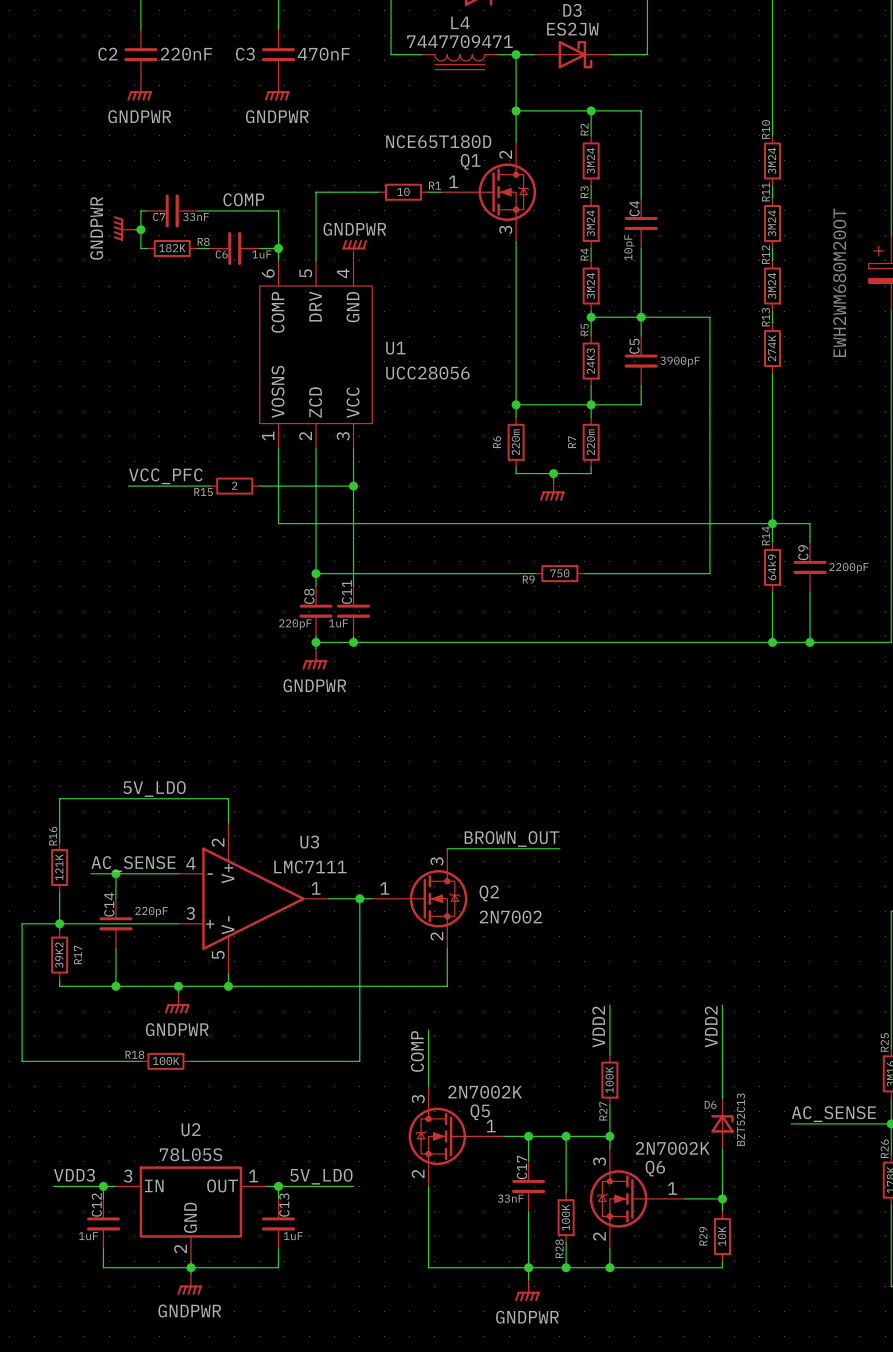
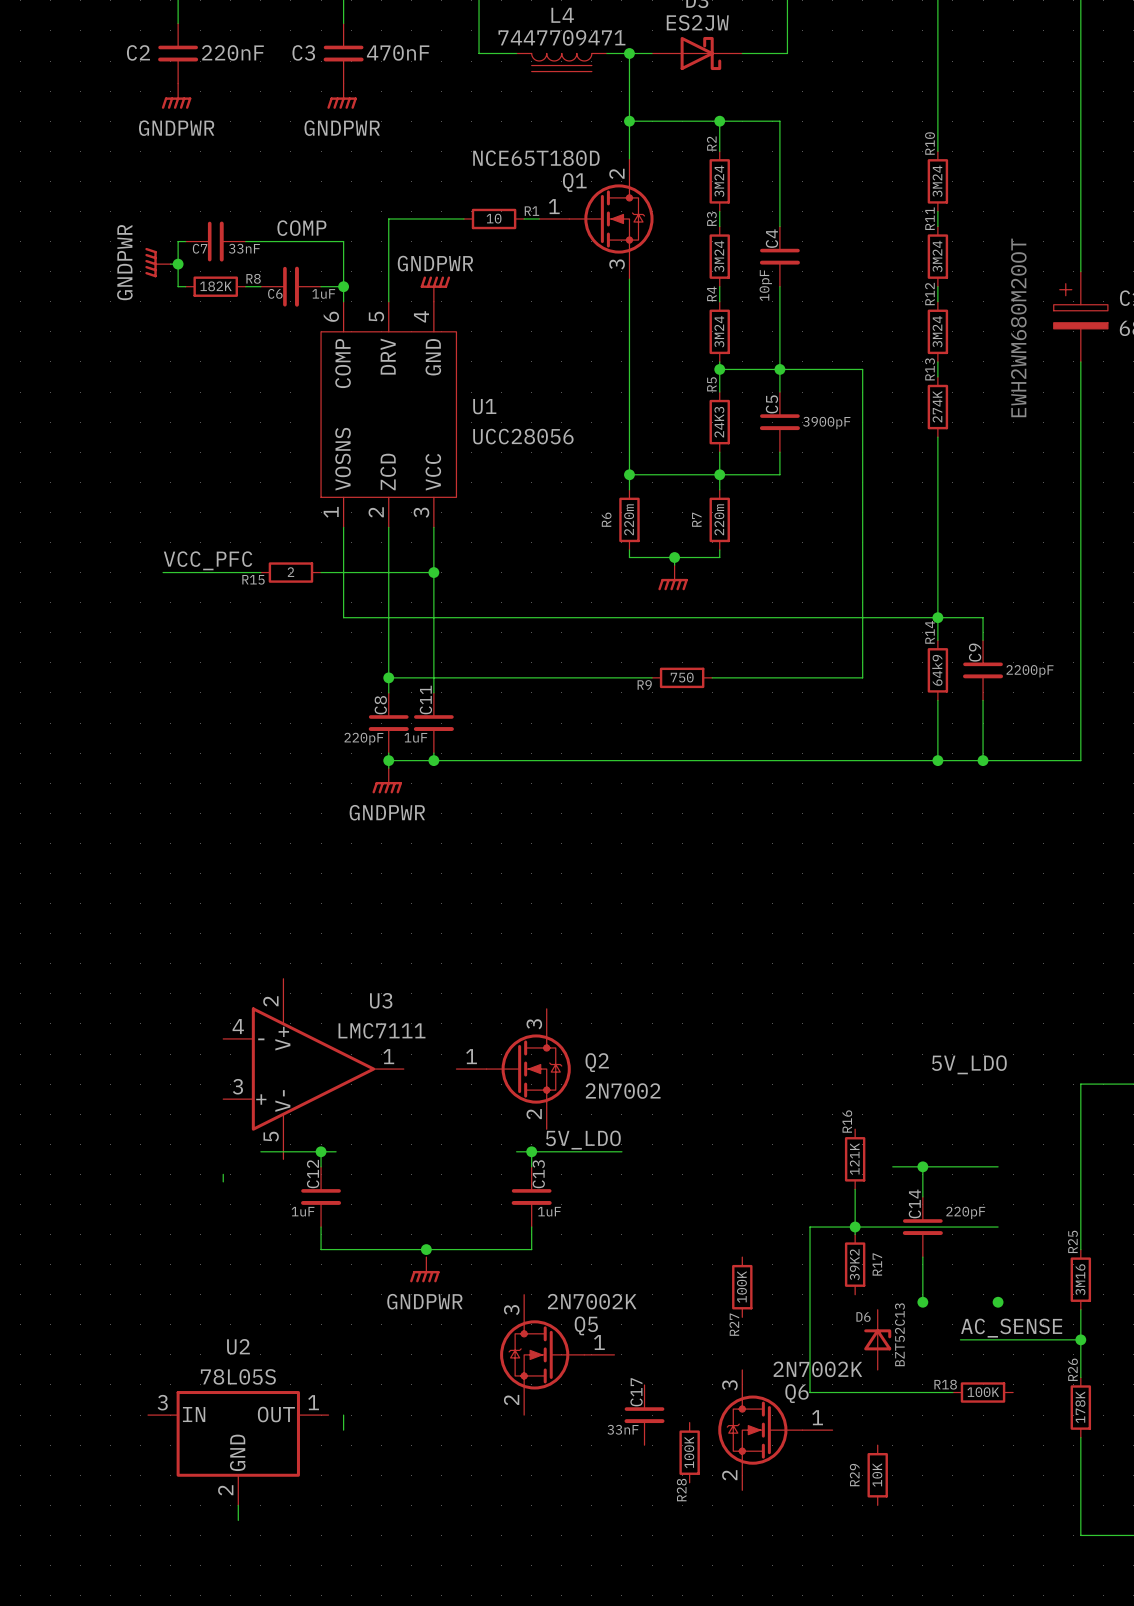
label: 5V_LDO (154, 788) -> none
wire: (228, 823) (228, 798) (59, 798) (59, 842) -> none
label: BROWN_OUT (512, 839) -> none
wire: (447, 848) (559, 848) -> none
label: AC_SENSE (133, 864) -> none
R16 position: (59, 867) -> (855, 1159)
wire: (90, 873) (178, 873) -> none
wire: (115, 873) (115, 898) -> none
junction: (115, 873) -> none
wire: (59, 892) (59, 930) -> none
label: none -> 5V_LDO (969, 1064)
wire: (328, 898) (372, 898) -> none
wire: (359, 898) (359, 1061) (190, 1061) -> none
junction: (359, 898) -> none
junction: (59, 923) -> none
C14 position: (115, 923) -> (922, 1227)
wire: (178, 923) (22, 923) (22, 1061) (140, 1061) -> none
wire: (115, 948) (115, 986) -> none
wire: (447, 948) (447, 986) (59, 986) (59, 980) -> none
R17 position: (59, 955) -> (855, 1264)
label: none -> 5V_LDO (583, 1140)
wire: none -> (260, 1151) (336, 1151)
wire: none -> (516, 1151) (621, 1151)
wire: none -> (531, 1151) (531, 1166)
junction: none -> (531, 1151)
wire: (228, 973) (228, 986) -> (321, 1151) (321, 1166)
wire: none -> (892, 1166) (998, 1166)
wire: none -> (922, 1166) (922, 1196)
junction: none -> (922, 1166)
junction: (115, 986) -> none
junction: (178, 986) -> none
junction position: (228, 986) -> (321, 1151)
wire: none -> (855, 1189) (855, 1234)
power symbol: GNDPWR (177, 1003) -> none
wire: (609, 1005) (609, 1055) -> none
wire: (722, 1005) (722, 1098) -> none
label: VDD2 (598, 1026) -> none
label: VDD2 (711, 1026) -> none
wire: none -> (321, 1227) (321, 1249) (531, 1249) (531, 1227)
wire: (428, 1030) (428, 1086) -> none
junction: none -> (855, 1227)
wire: none -> (998, 1227) (810, 1227) (810, 1392) (952, 1392)
junction: none -> (426, 1249)
label: COMP (417, 1051) -> none
wire: none -> (922, 1257) (922, 1302)
R18 position: (165, 1061) -> (983, 1392)
power symbol: none -> GNDPWR (424, 1269)
junction: none -> (922, 1302)
junction: none -> (998, 1302)
wire: (609, 1105) (609, 1148) -> none
wire: (503, 1136) (609, 1136) -> none
wire: (528, 1136) (528, 1161) -> none
junction: (528, 1136) -> none
wire: (566, 1136) (566, 1192) -> none
junction: (566, 1136) -> none
junction: (609, 1136) -> none
wire: (722, 1148) (722, 1211) -> none
label: VDD3 (74, 1175) -> none
label: 5V_LDO (321, 1176) -> none
wire: (53, 1186) (115, 1186) -> none
wire: (103, 1186) (103, 1198) -> none
junction: (103, 1186) -> none
wire: (265, 1186) (353, 1186) -> none
junction: (278, 1186) -> none
wire: (428, 1186) (428, 1267) (722, 1267) (722, 1261) -> none
wire: (684, 1198) (722, 1198) -> none
junction: (722, 1198) -> none
wire: (528, 1211) (528, 1280) -> none
C12 position: (103, 1223) -> (321, 1196)
C13 position: (278, 1223) -> (531, 1196)
wire: (566, 1242) (566, 1267) -> none
wire: (103, 1248) (103, 1267) (278, 1267) (278, 1248) -> none
wire: (609, 1248) (609, 1267) -> none
junction: (190, 1267) -> none
junction: (528, 1267) -> none
junction: (566, 1267) -> none
junction: (609, 1267) -> none
power symbol: GNDPWR (189, 1284) -> none
power symbol: GNDPWR (527, 1290) -> none

